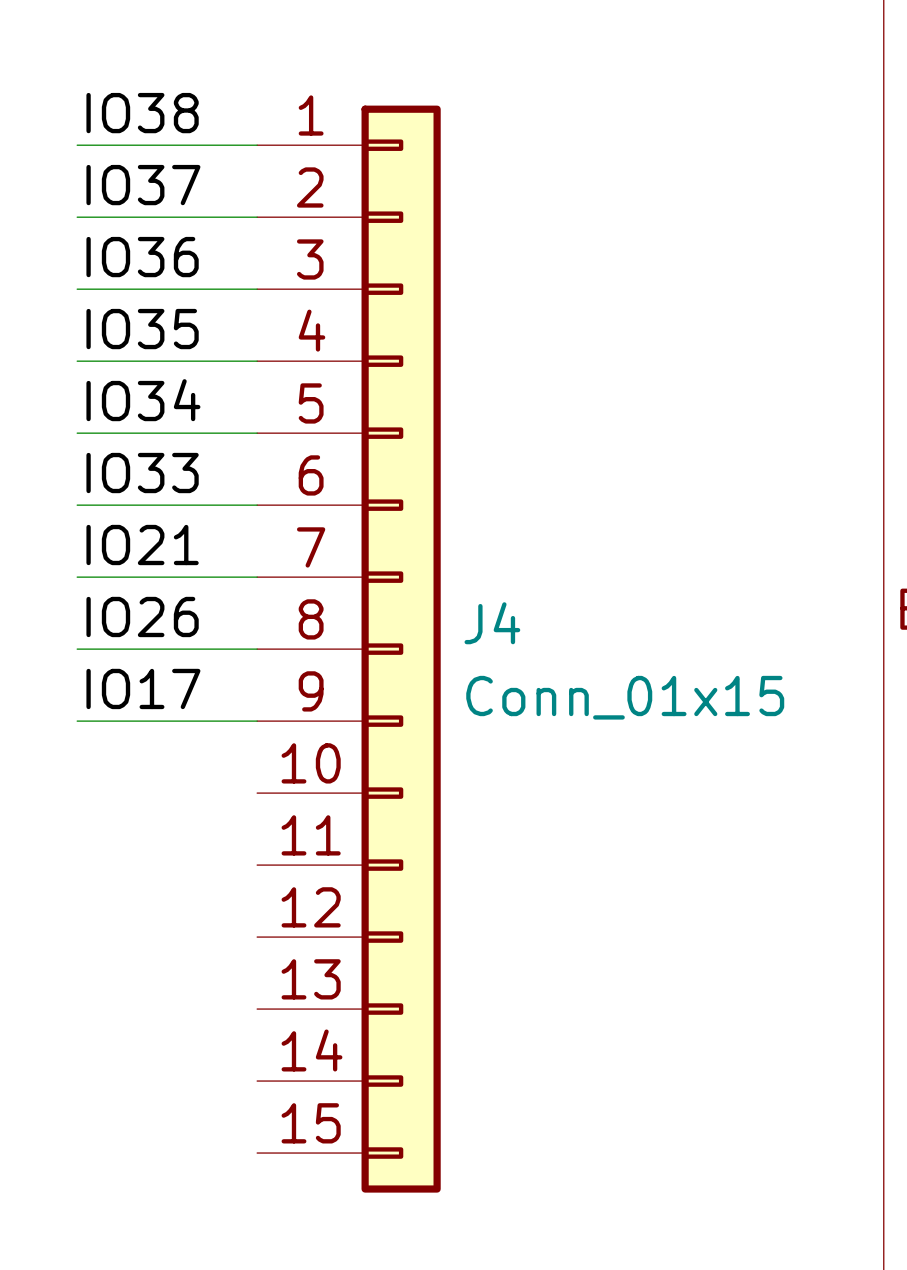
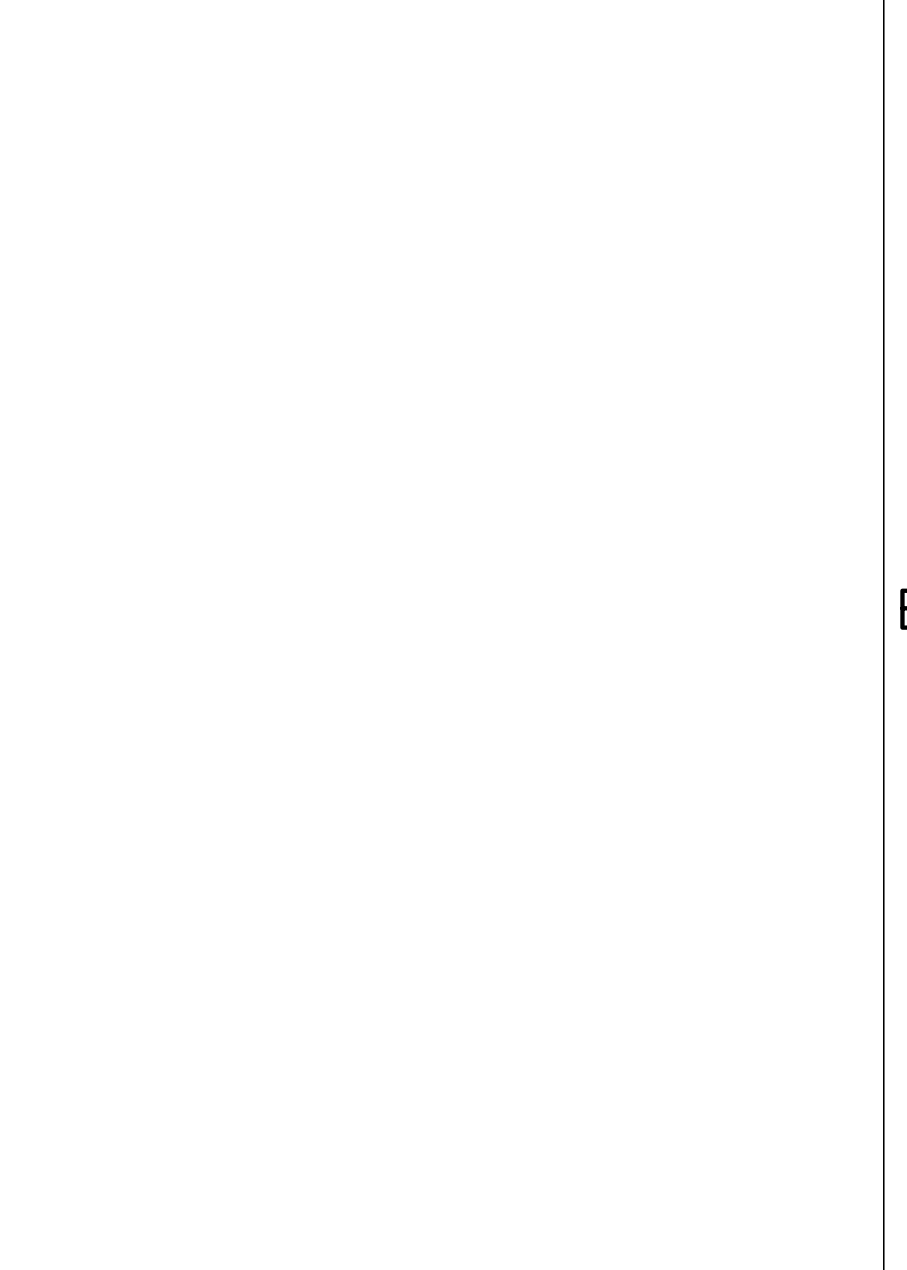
label: IO38 (142, 113) -> none
wire: (77, 145) (257, 145) -> none
label: IO37 (143, 185) -> none
wire: (77, 217) (257, 217) -> none
label: IO36 (142, 257) -> none
wire: (77, 289) (257, 289) -> none
label: IO35 (142, 329) -> none
wire: (77, 361) (257, 361) -> none
label: IO34 (143, 400) -> none
wire: (77, 433) (257, 433) -> none
label: IO33 (142, 473) -> none
wire: (77, 505) (257, 505) -> none
label: IO21 (142, 545) -> none
wire: (77, 577) (257, 577) -> none
label: IO26 (142, 616) -> none
wire: (77, 649) (257, 649) -> none
J4: Conn_01x15 (348, 649) -> none
label: IO17 (143, 688) -> none
wire: (77, 721) (257, 721) -> none

